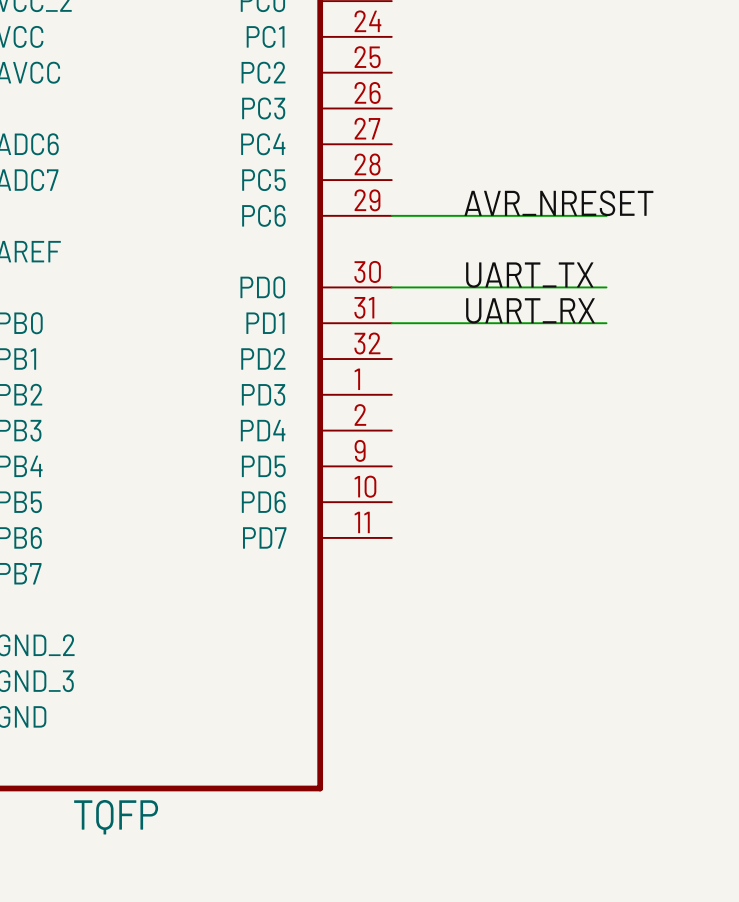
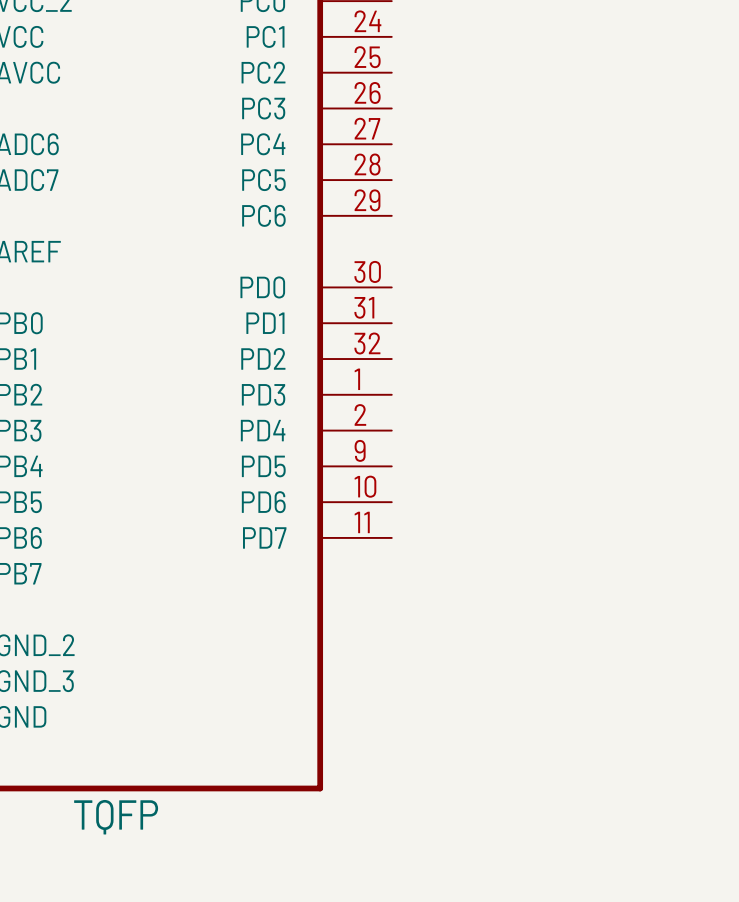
label: AVR_NRESET (558, 203) -> none
wire: (391, 215) (606, 215) -> none
label: UART_TX (529, 275) -> none
wire: (391, 287) (606, 287) -> none
label: UART_RX (530, 310) -> none
wire: (391, 323) (606, 323) -> none

